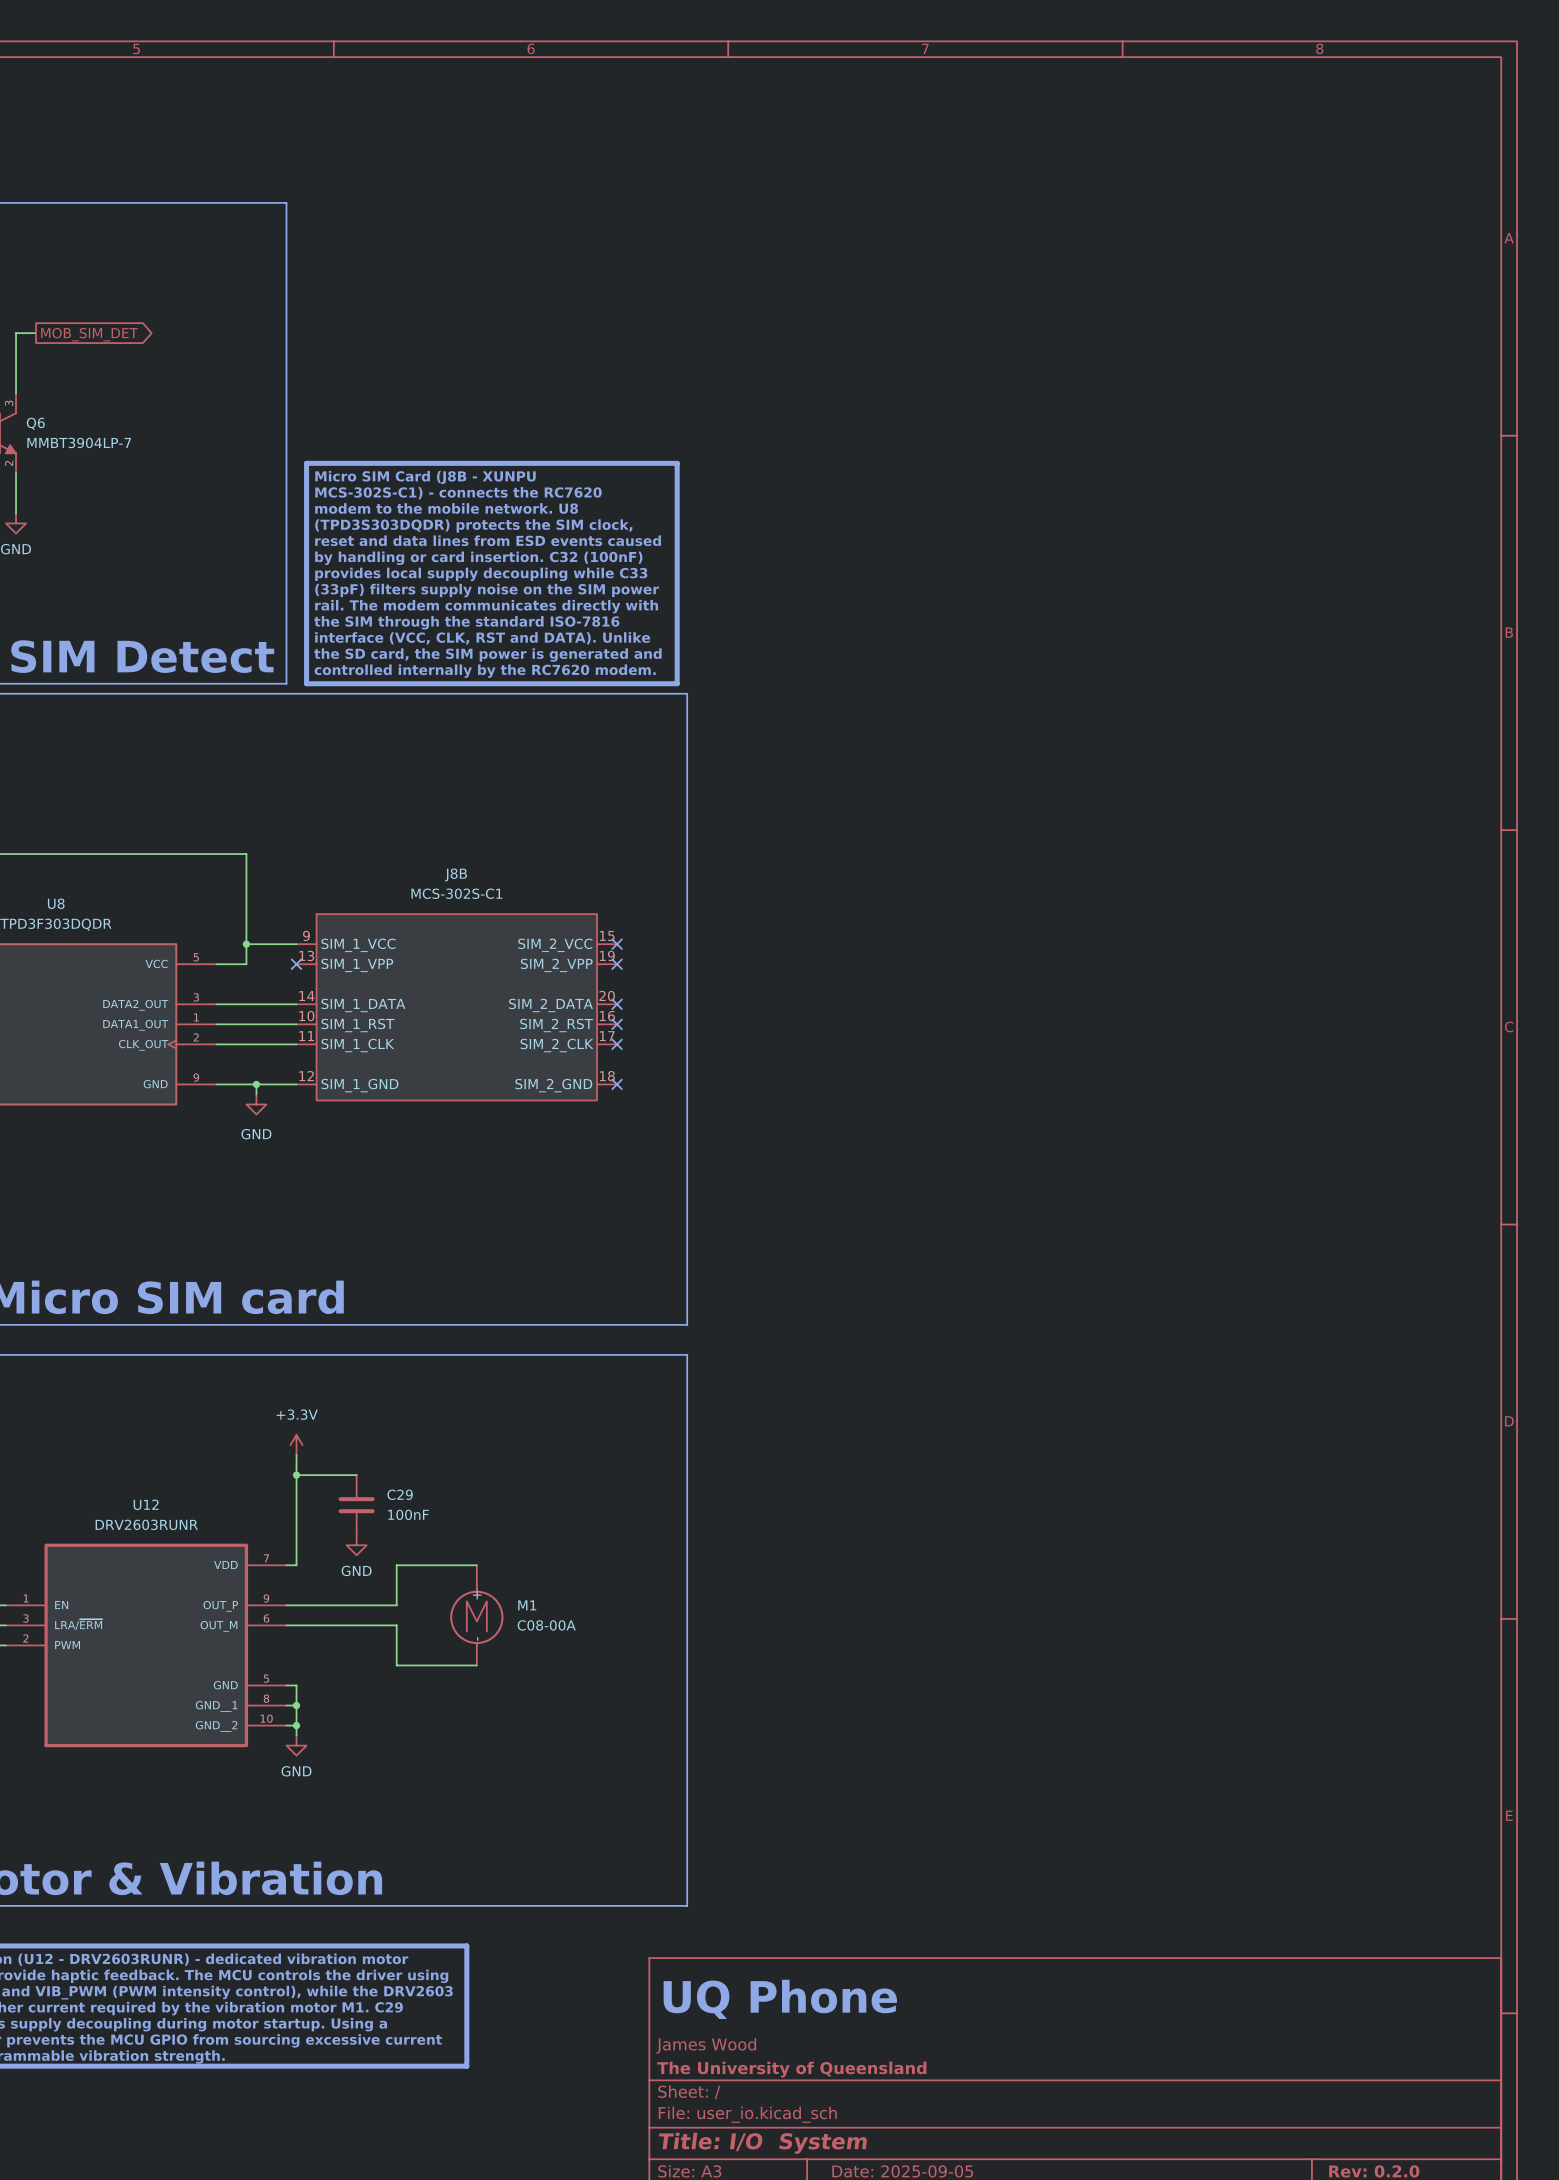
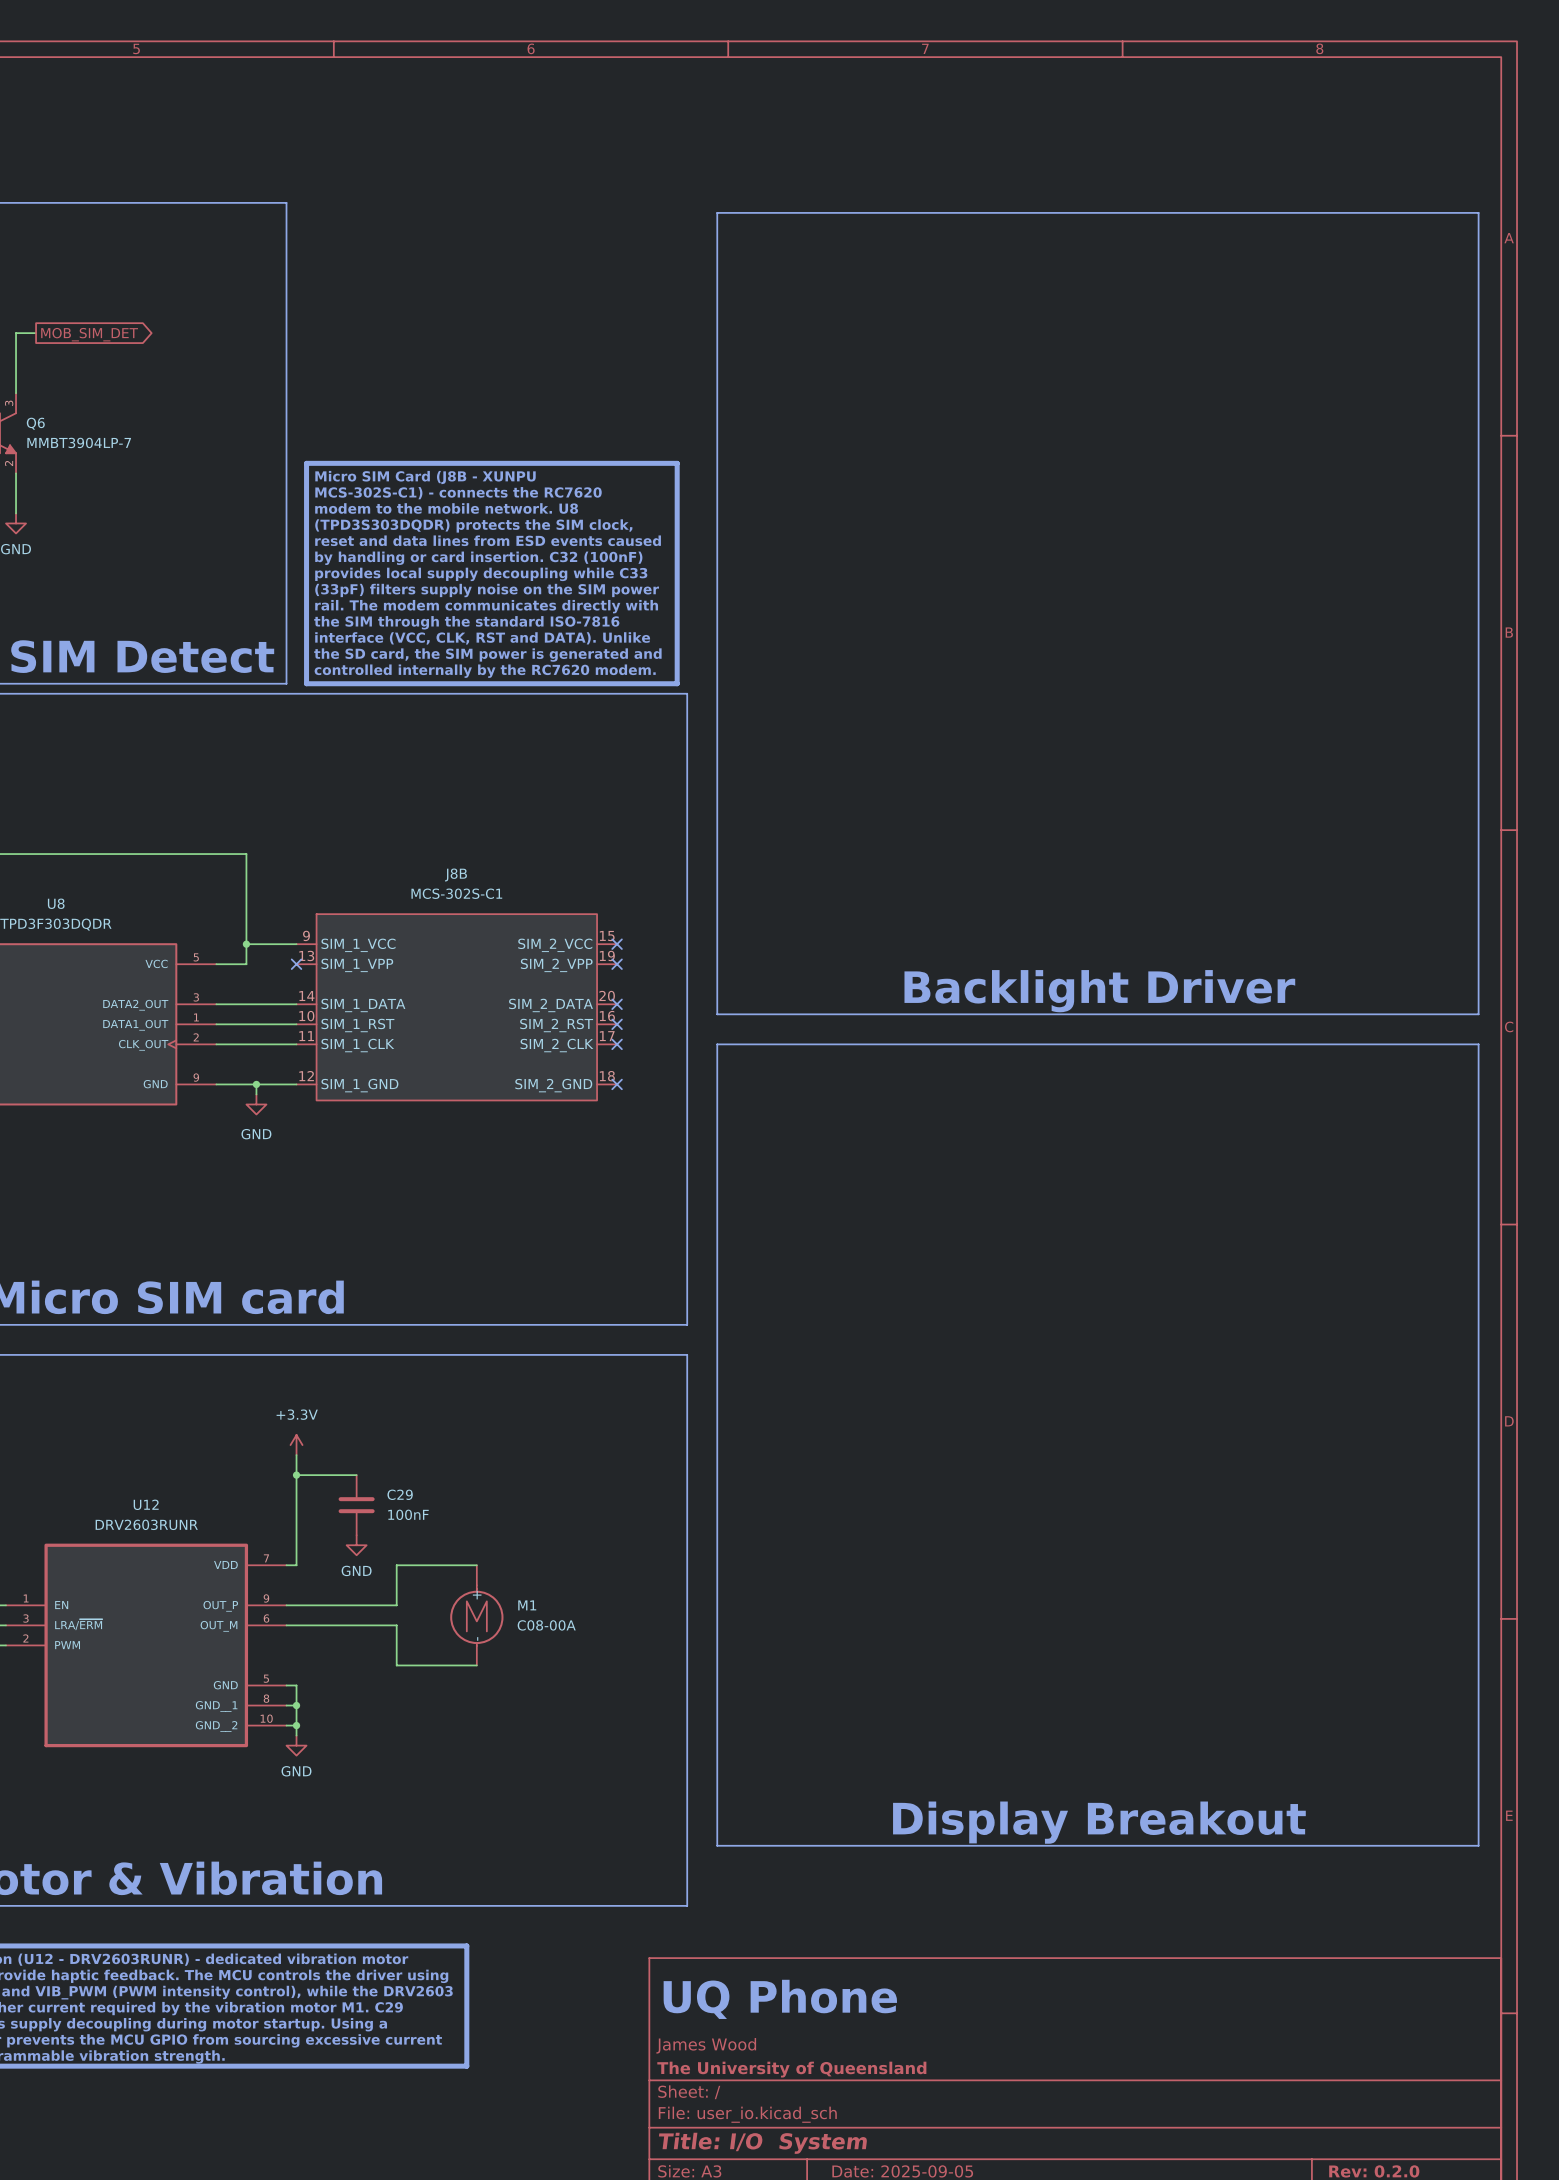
line: none -> (717, 212) (1478, 212) (1478, 1014) (717, 1014) (717, 212)
text: none -> Backlight Driver (1099, 991)
line: none -> (717, 1044) (717, 1845) (1478, 1845) (1478, 1044) (717, 1044)
text: none -> Display Breakout (1099, 1822)

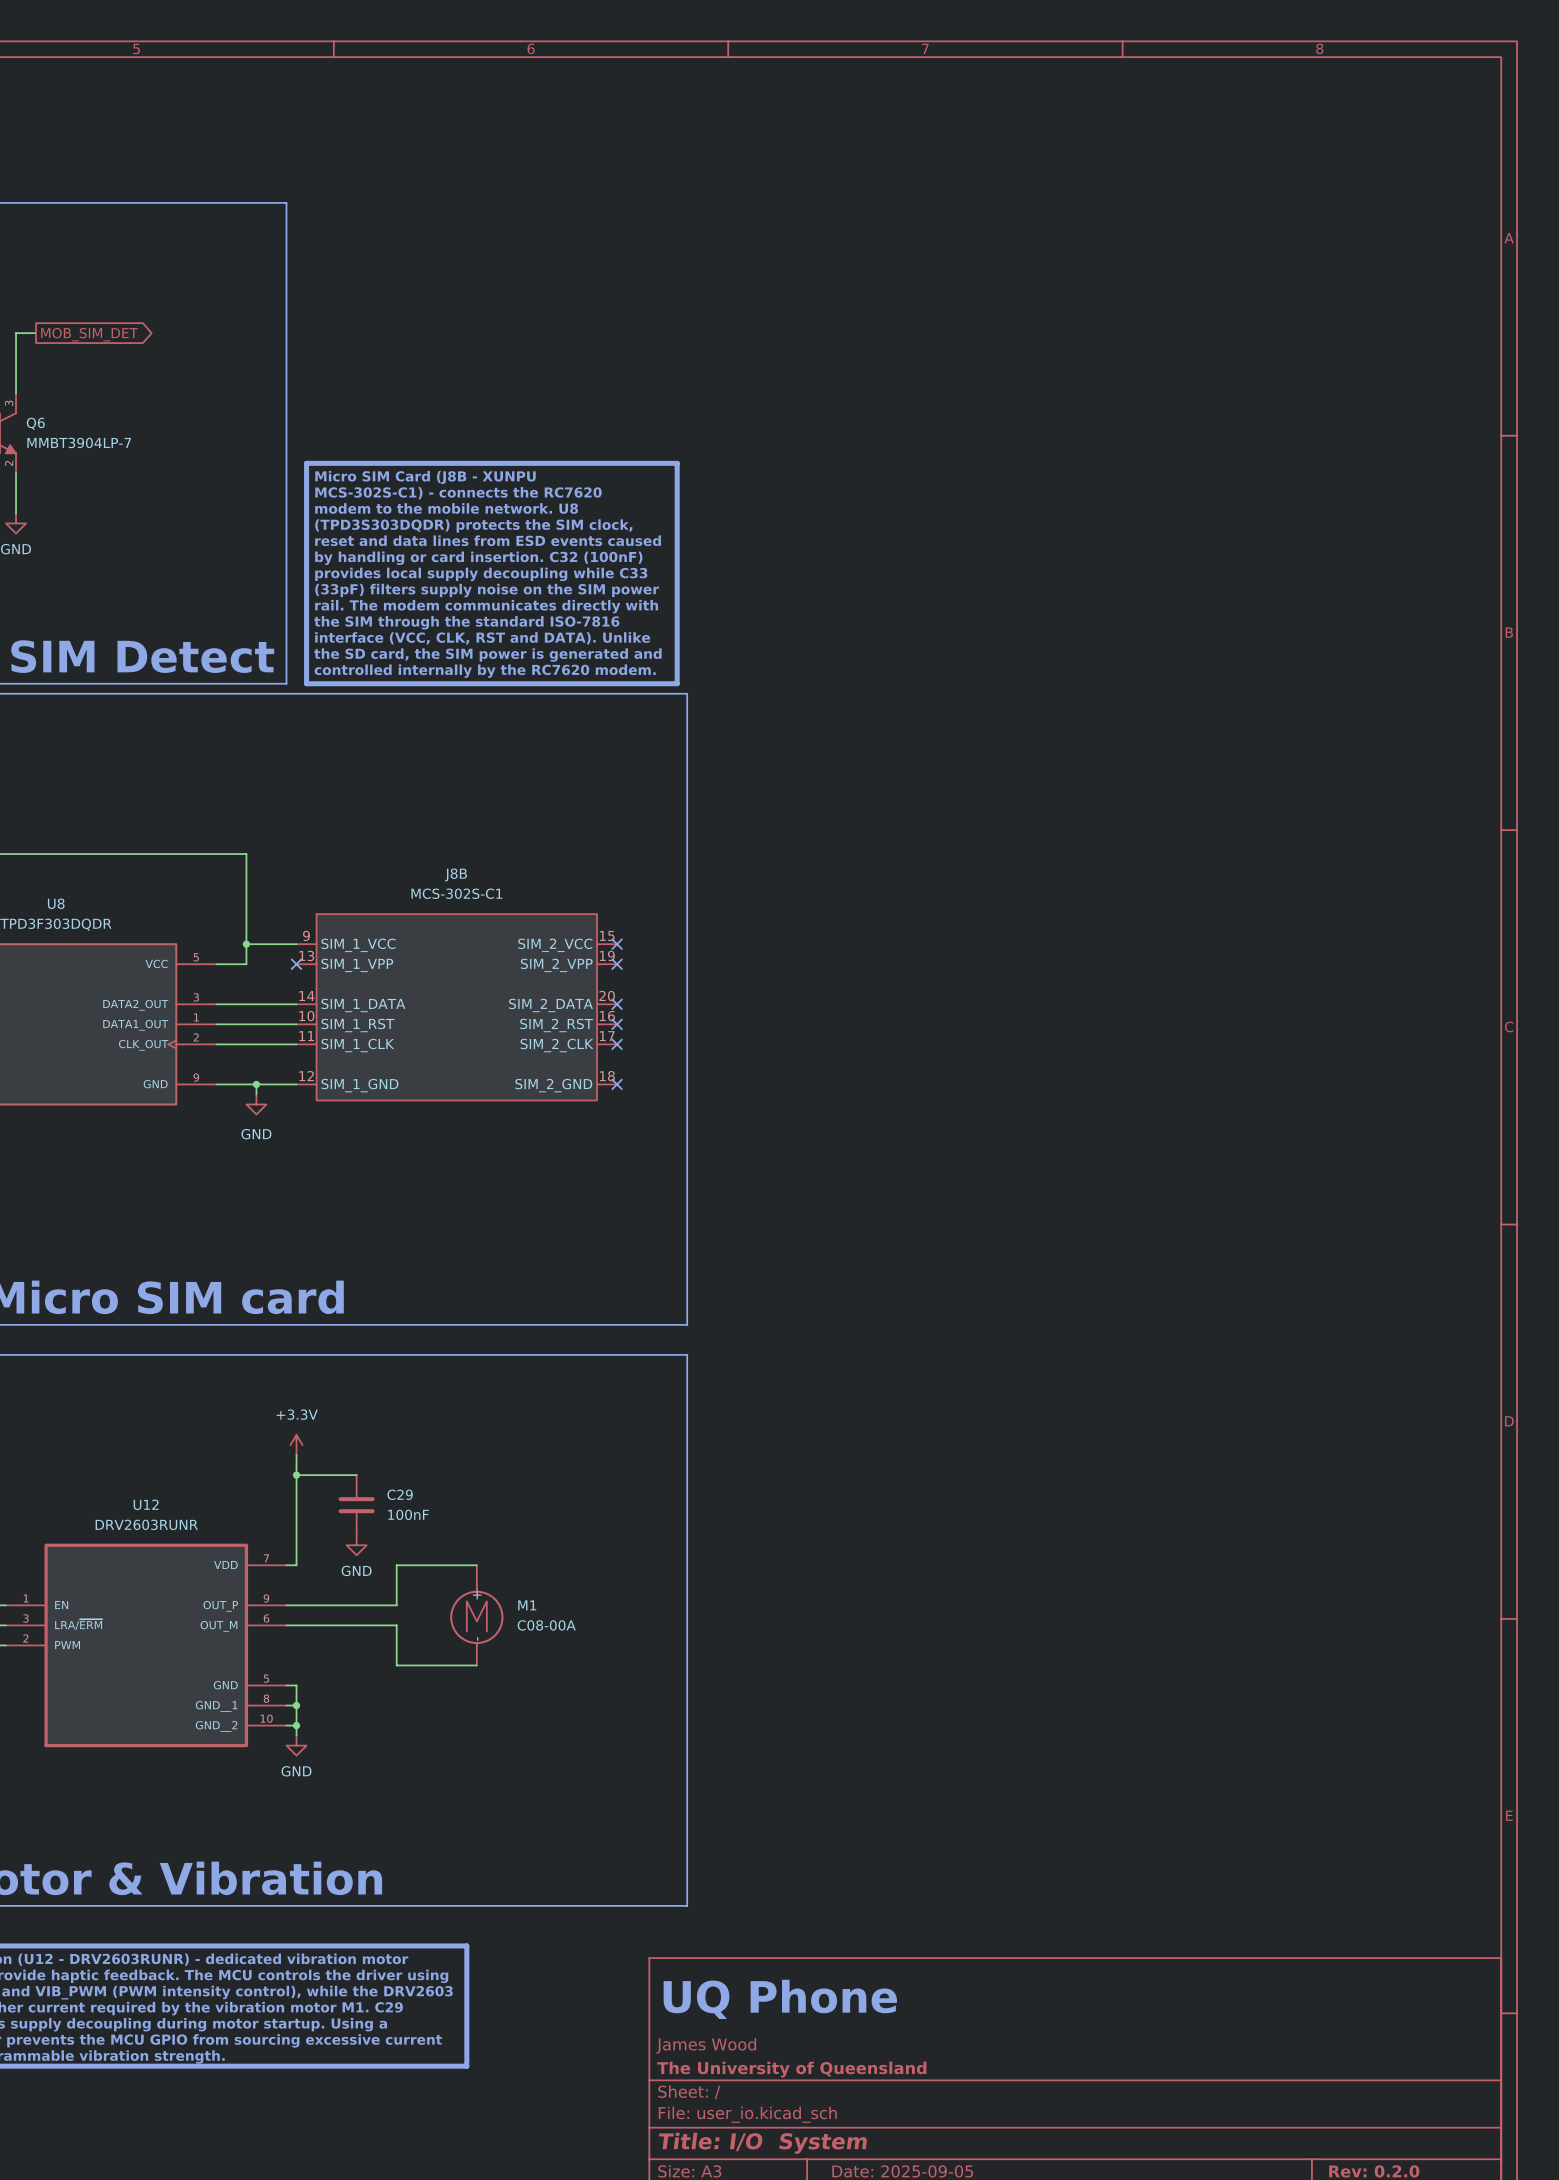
line: (717, 212) (1478, 212) (1478, 1014) (717, 1014) (717, 212) -> none
text: Backlight Driver (1099, 991) -> none
line: (717, 1044) (717, 1845) (1478, 1845) (1478, 1044) (717, 1044) -> none
text: Display Breakout (1099, 1822) -> none

